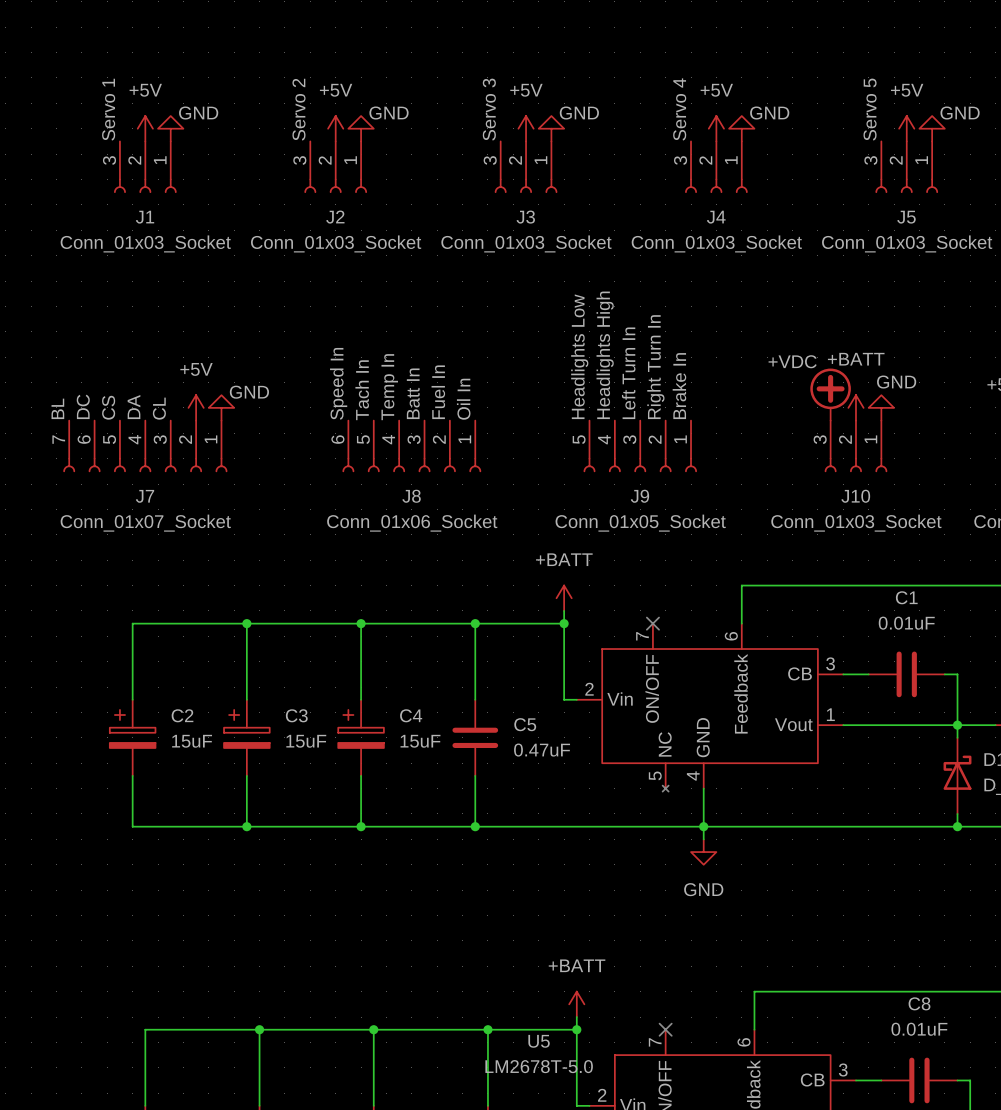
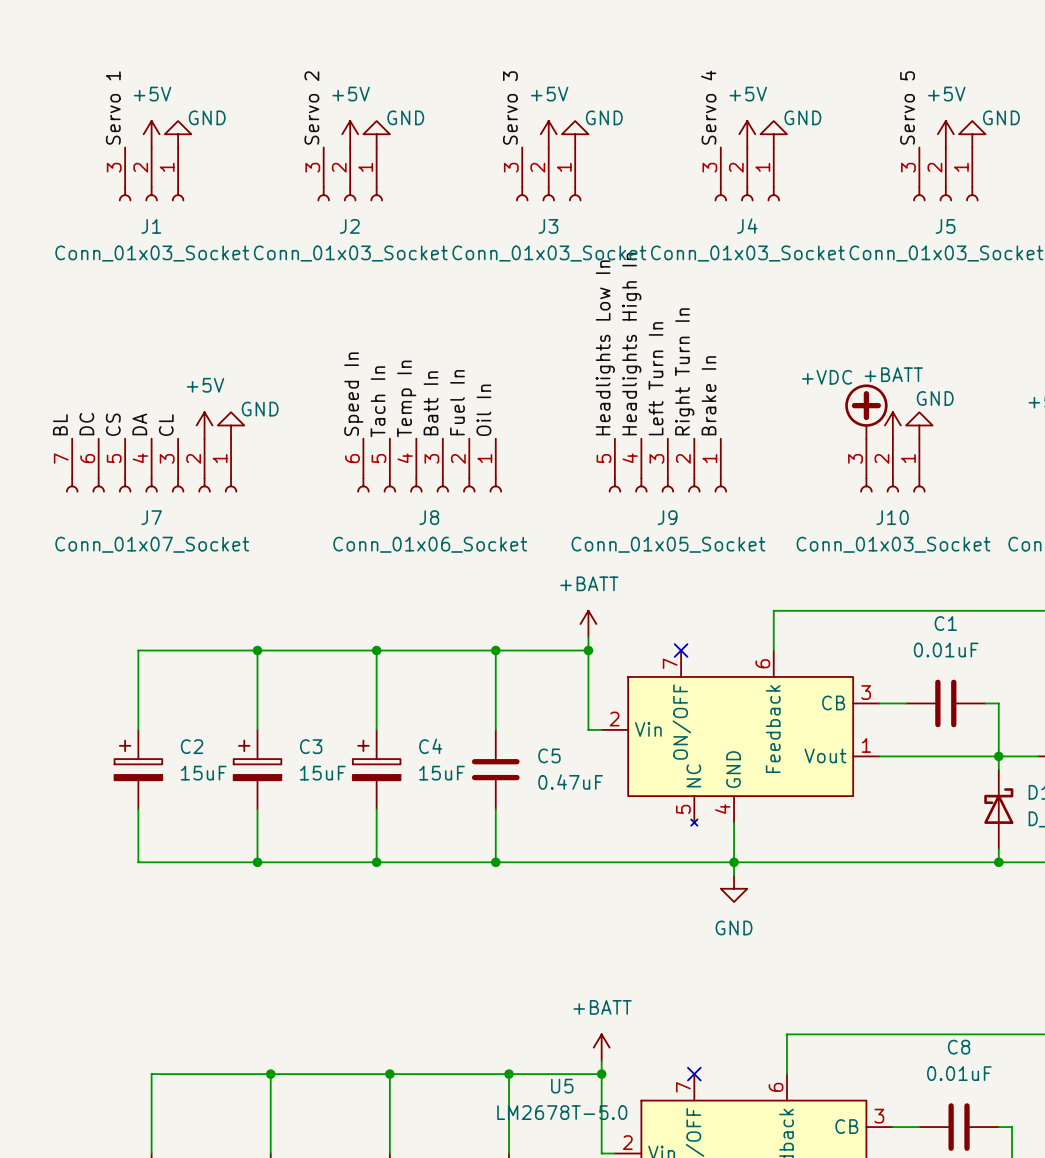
label: Headlights High (605, 355) -> Headlights High In (631, 344)
label: Headlights Low (579, 356) -> Headlights Low In (605, 347)

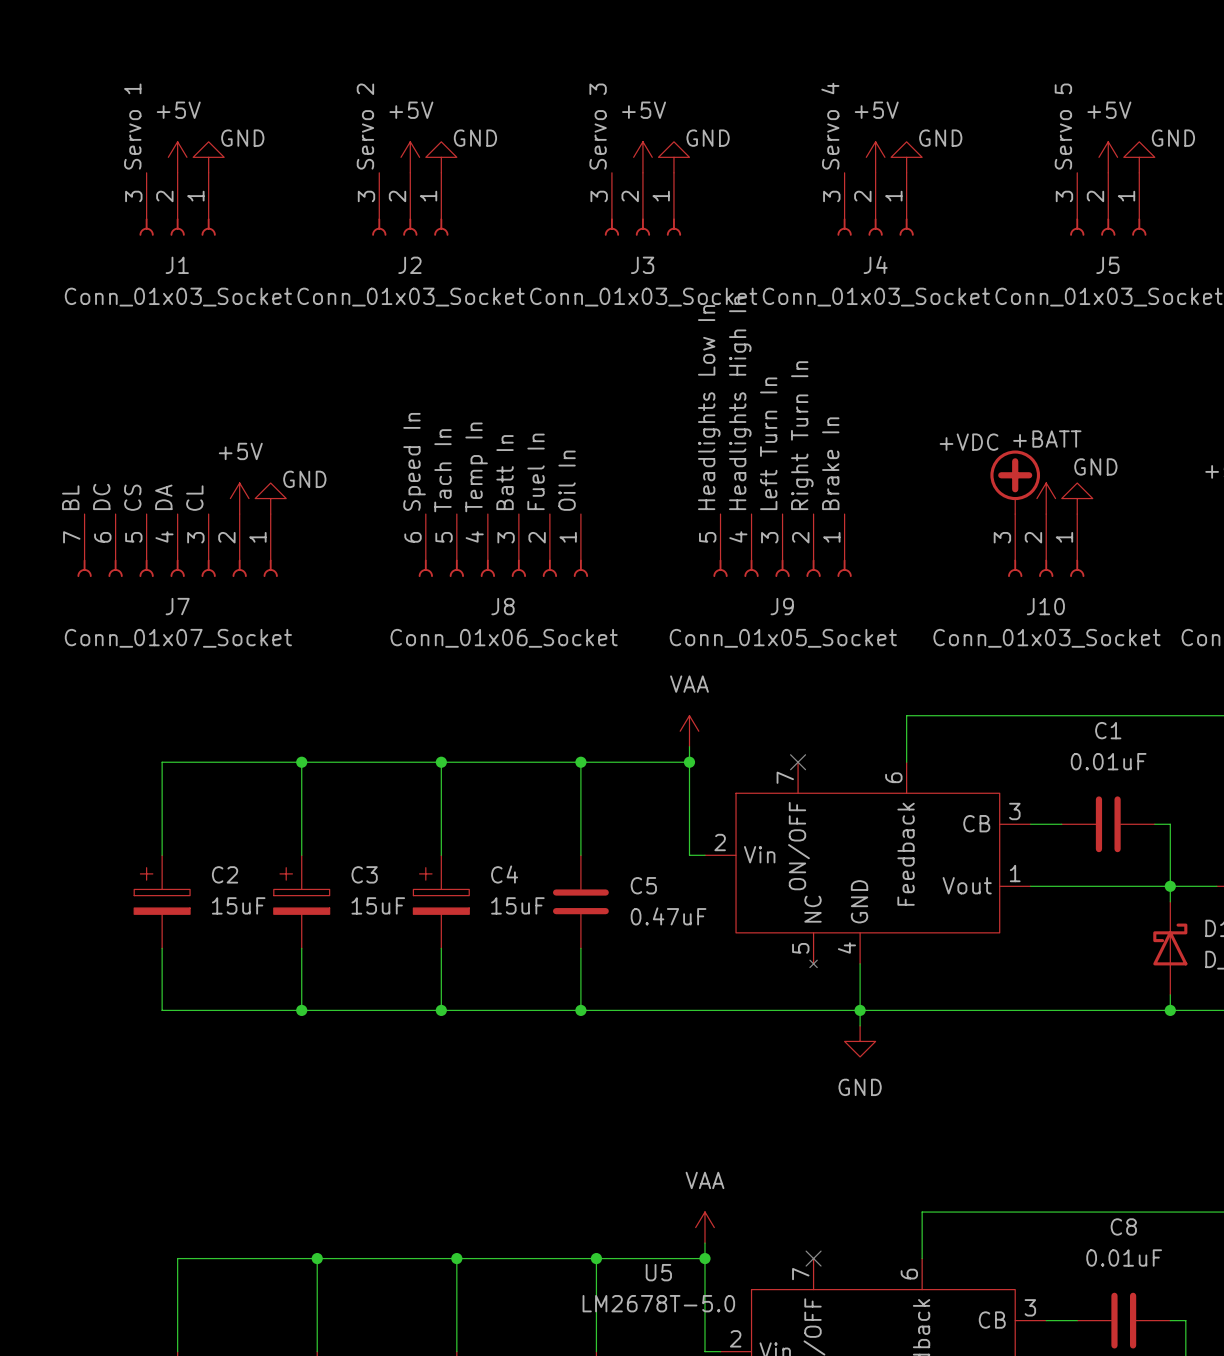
power symbol: +BATT (588, 624) -> VAA (689, 731)
power symbol: +BATT (601, 1047) -> VAA (705, 1227)

